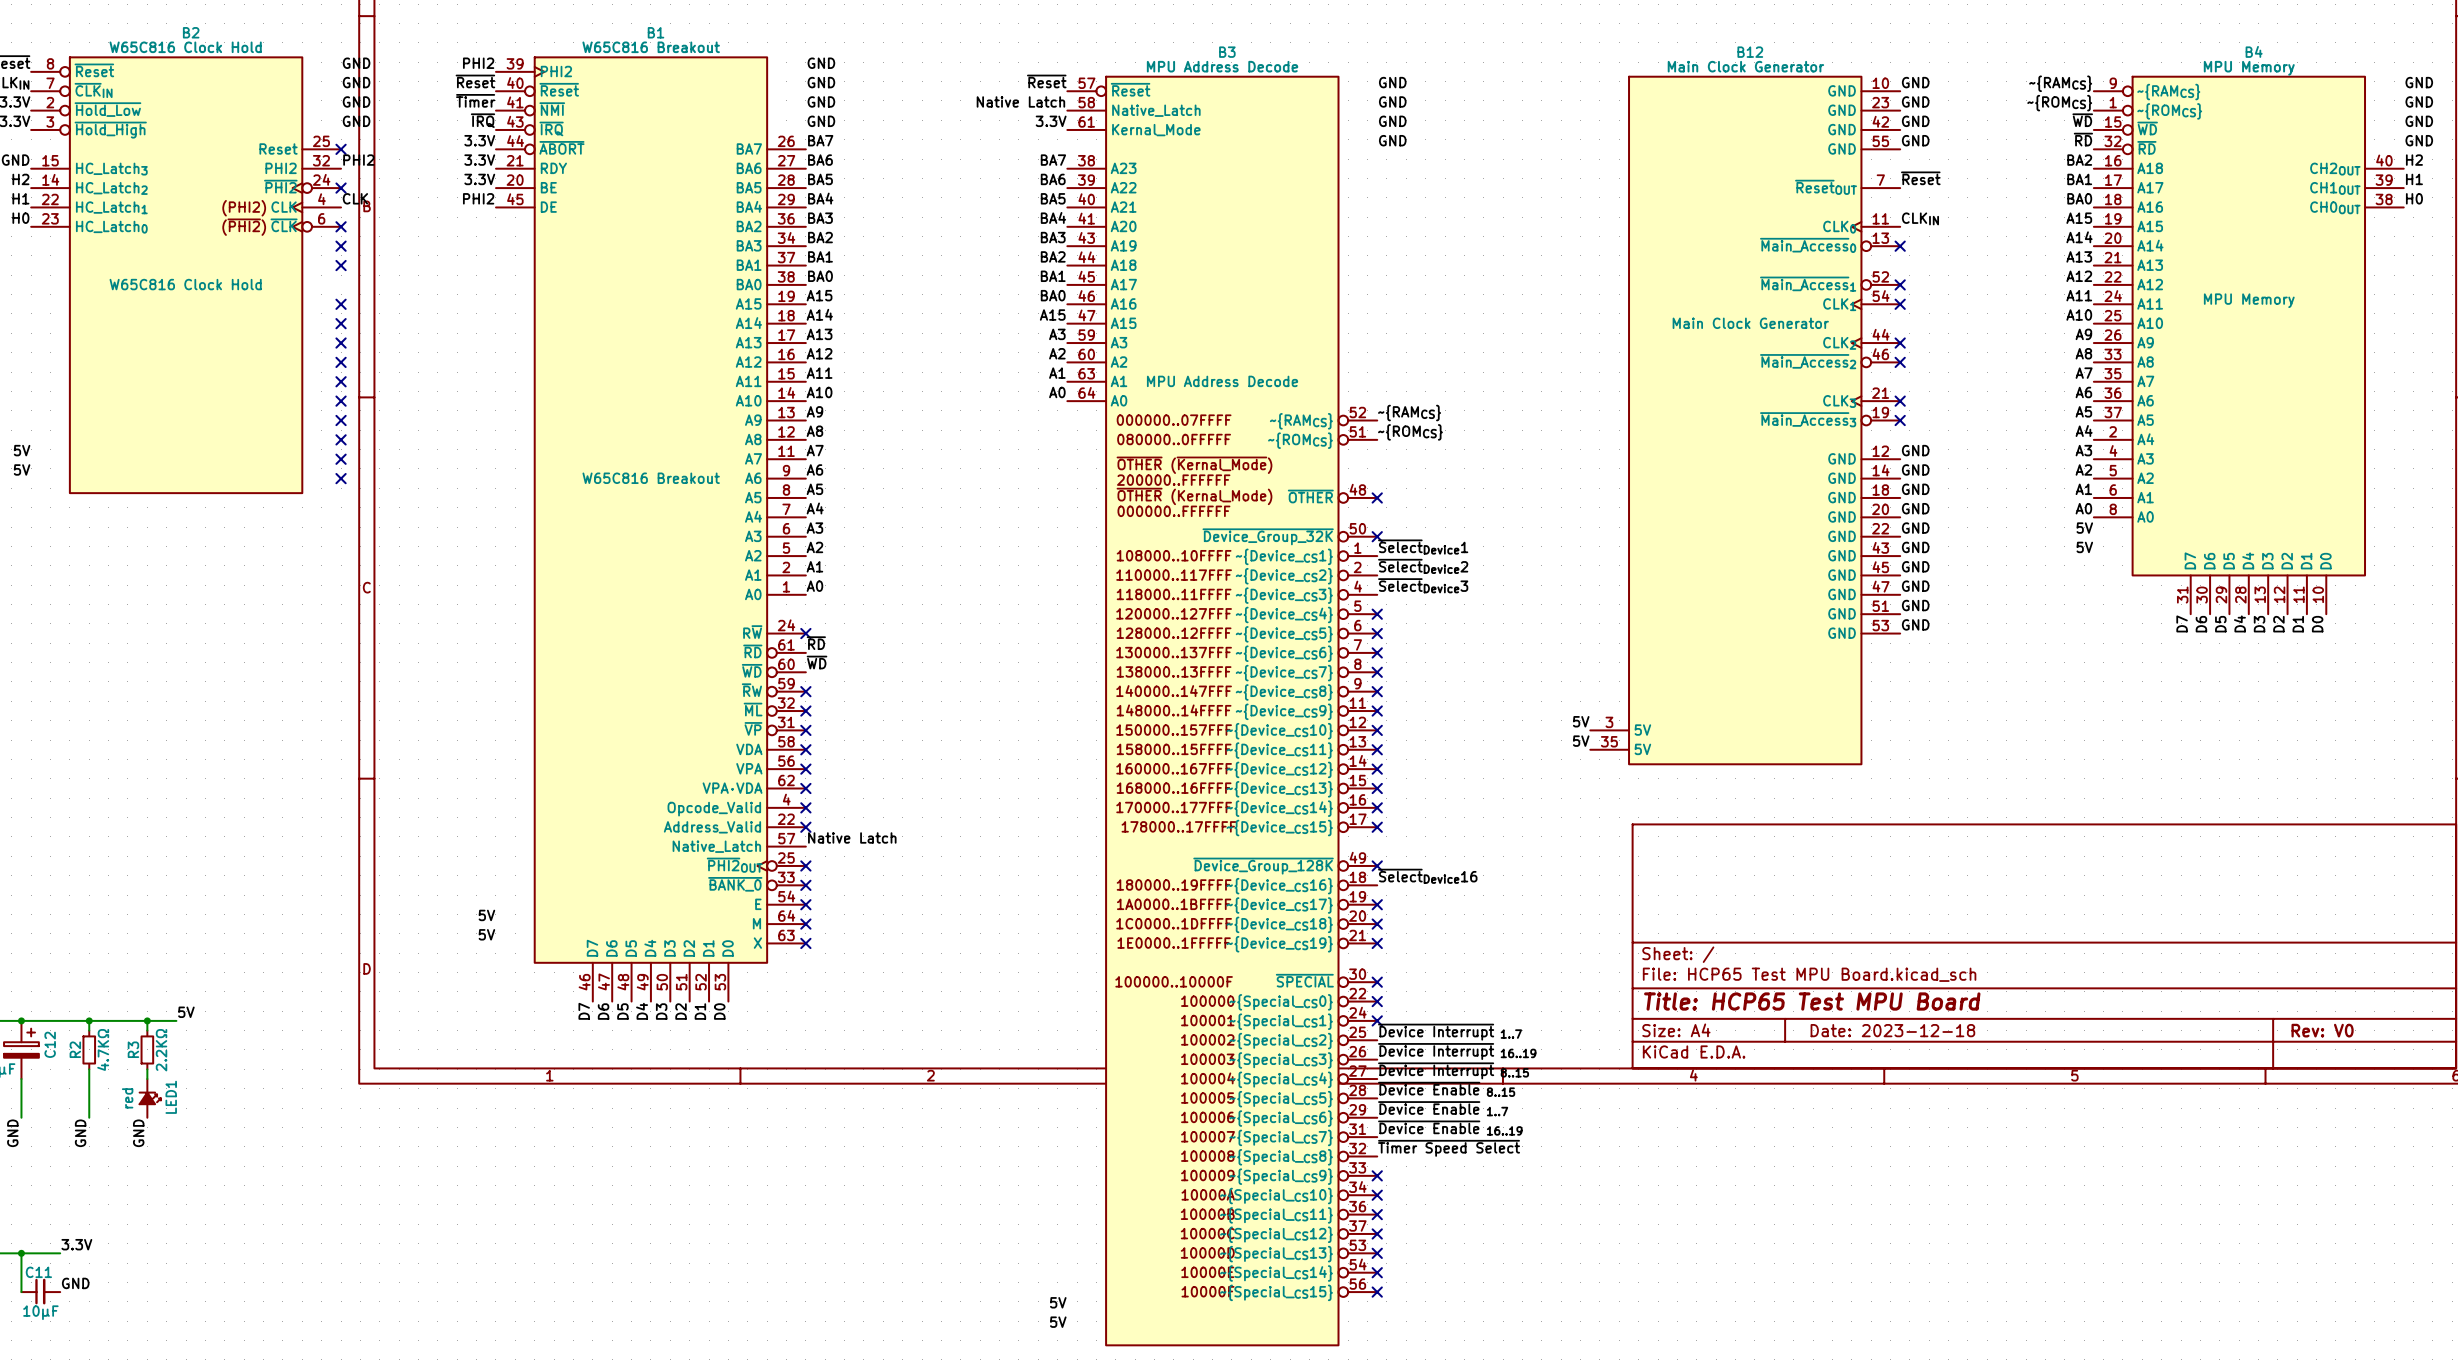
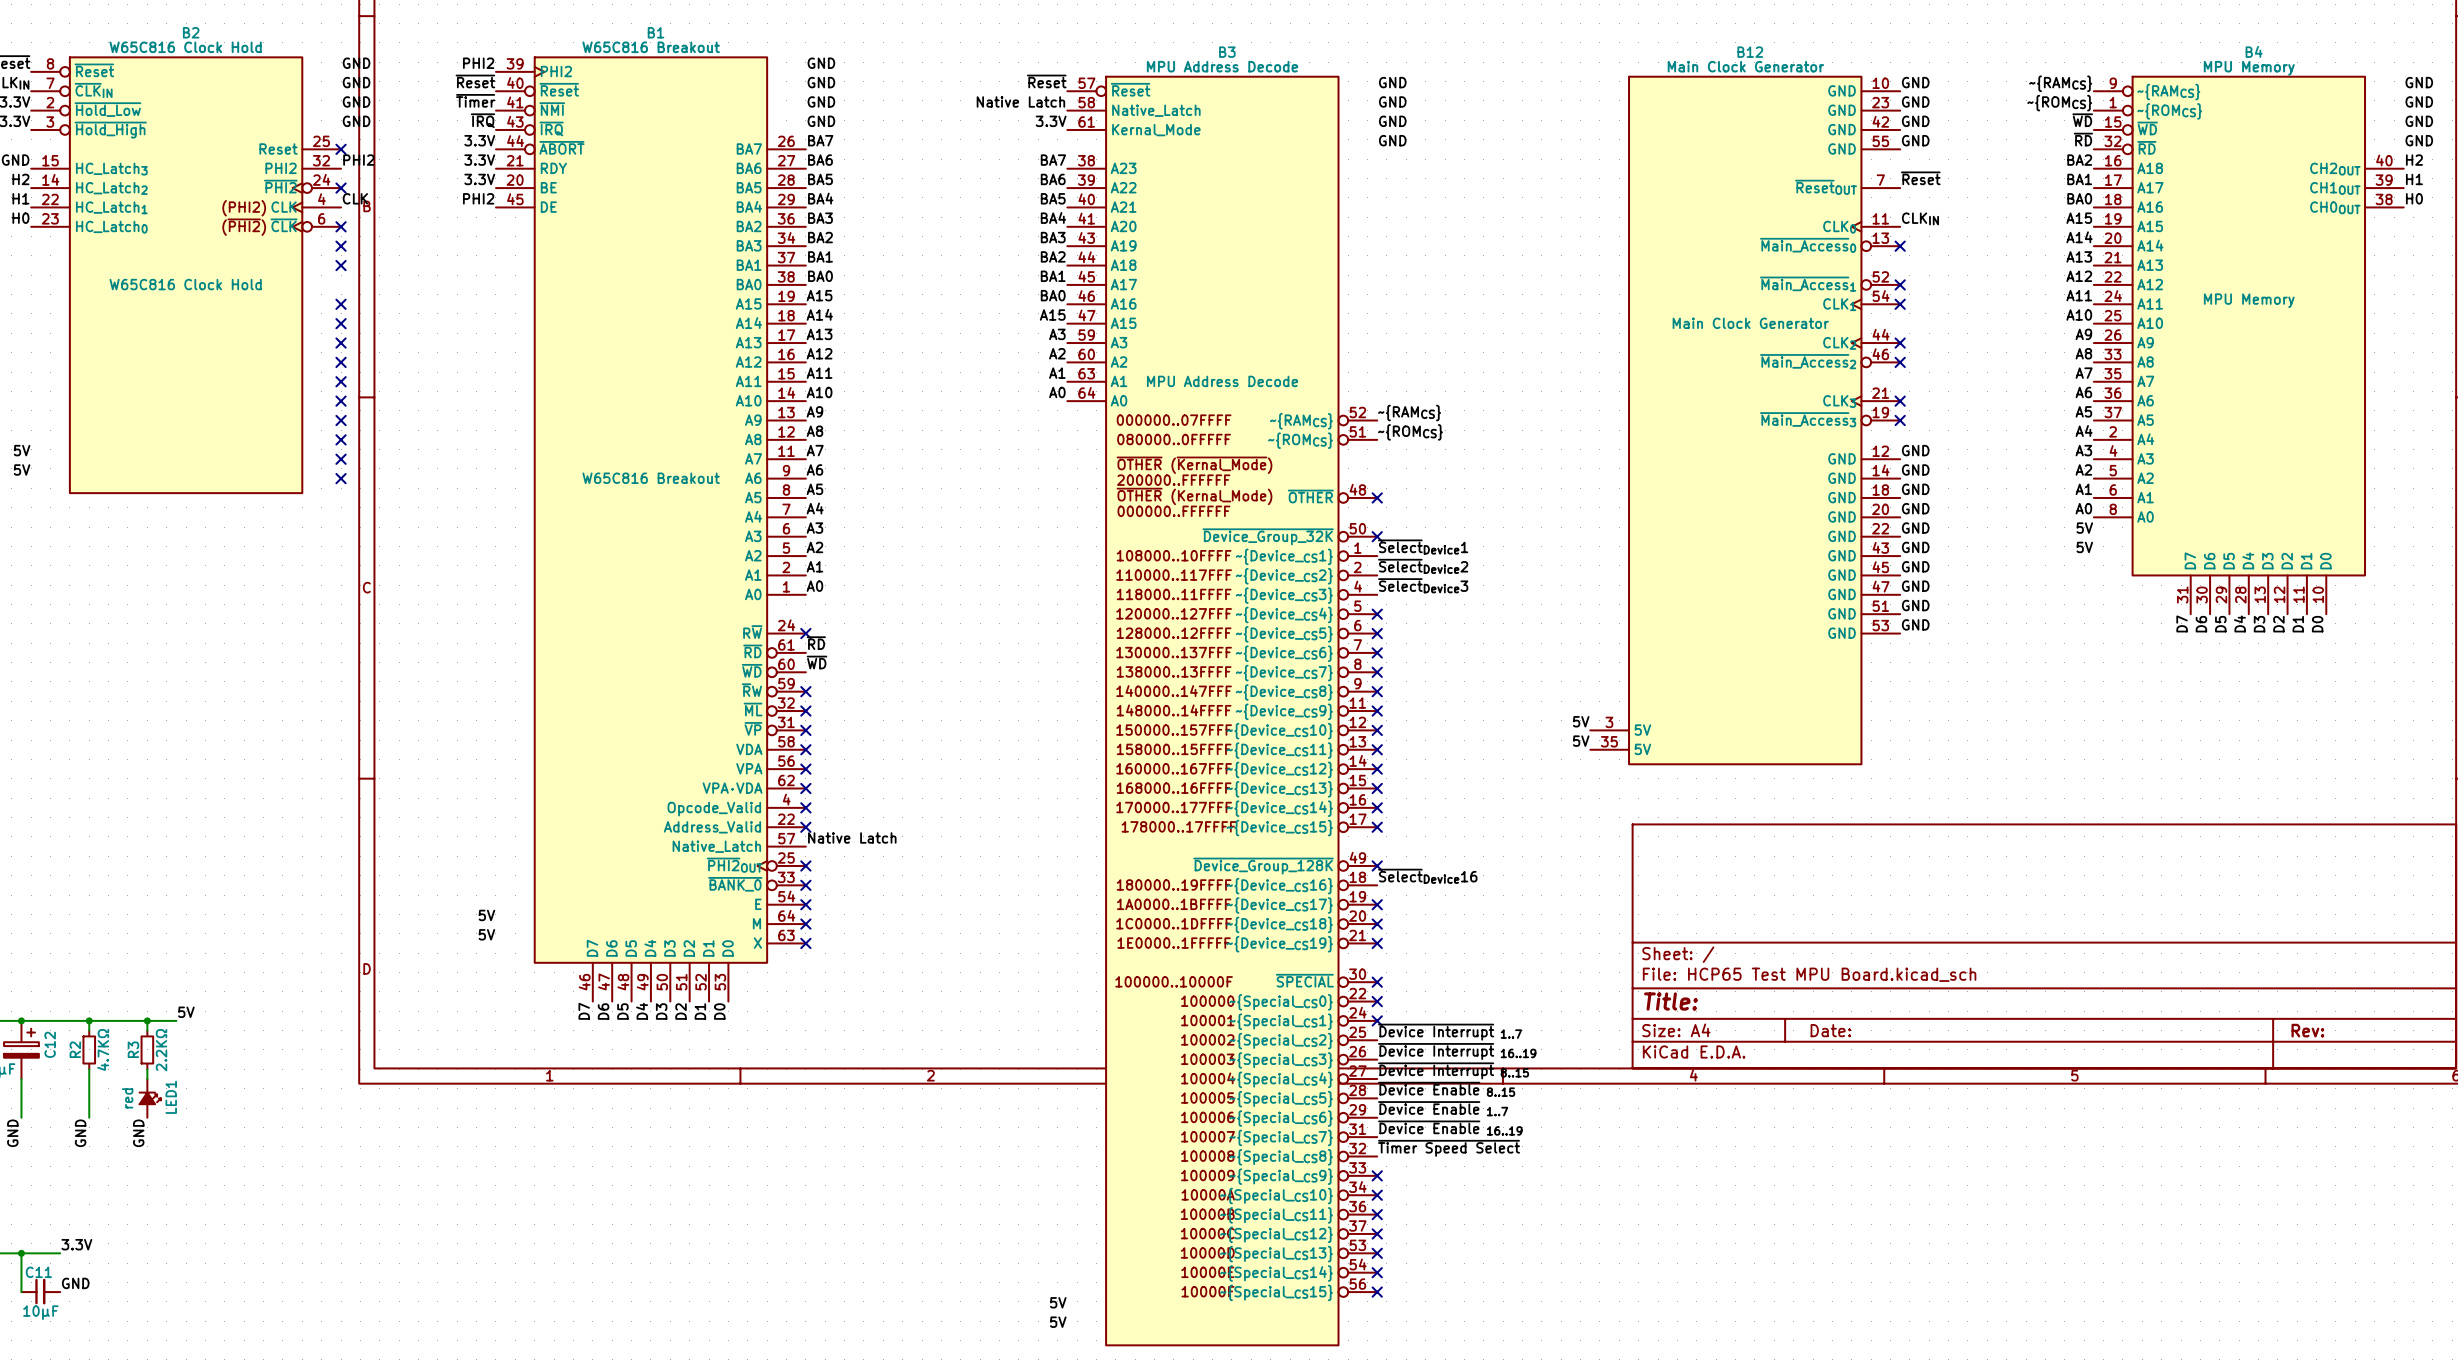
title block: Title: HCP65 Test MPU Board (1812, 1001) -> Title: (1670, 1001)
title block: Date: 2023-12-18 (1892, 1030) -> Date: (1830, 1030)
title block: Rev: V0 (2322, 1030) -> Rev: (2307, 1030)

